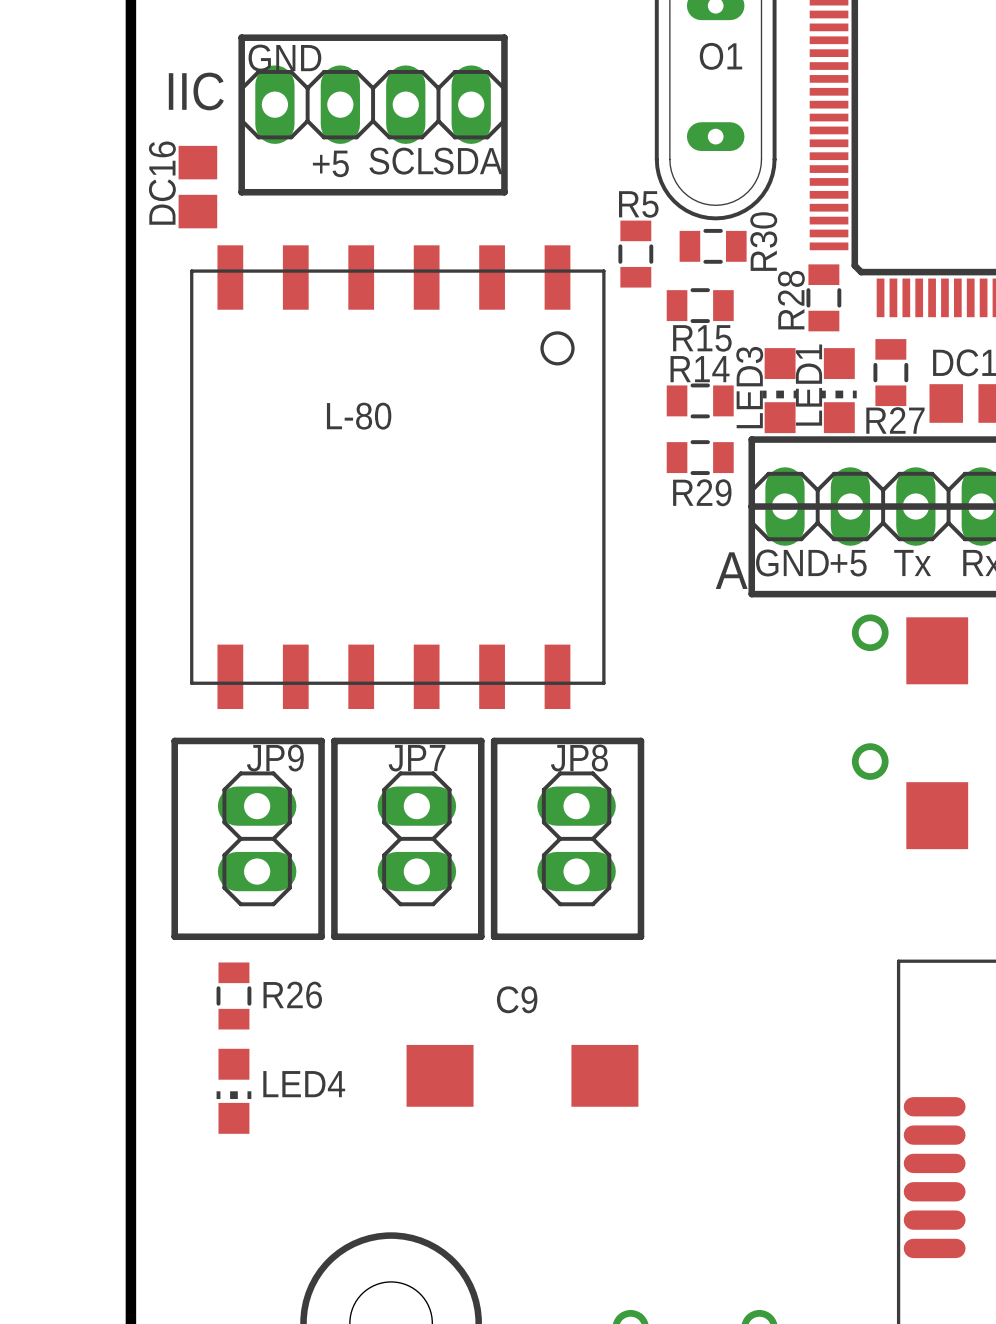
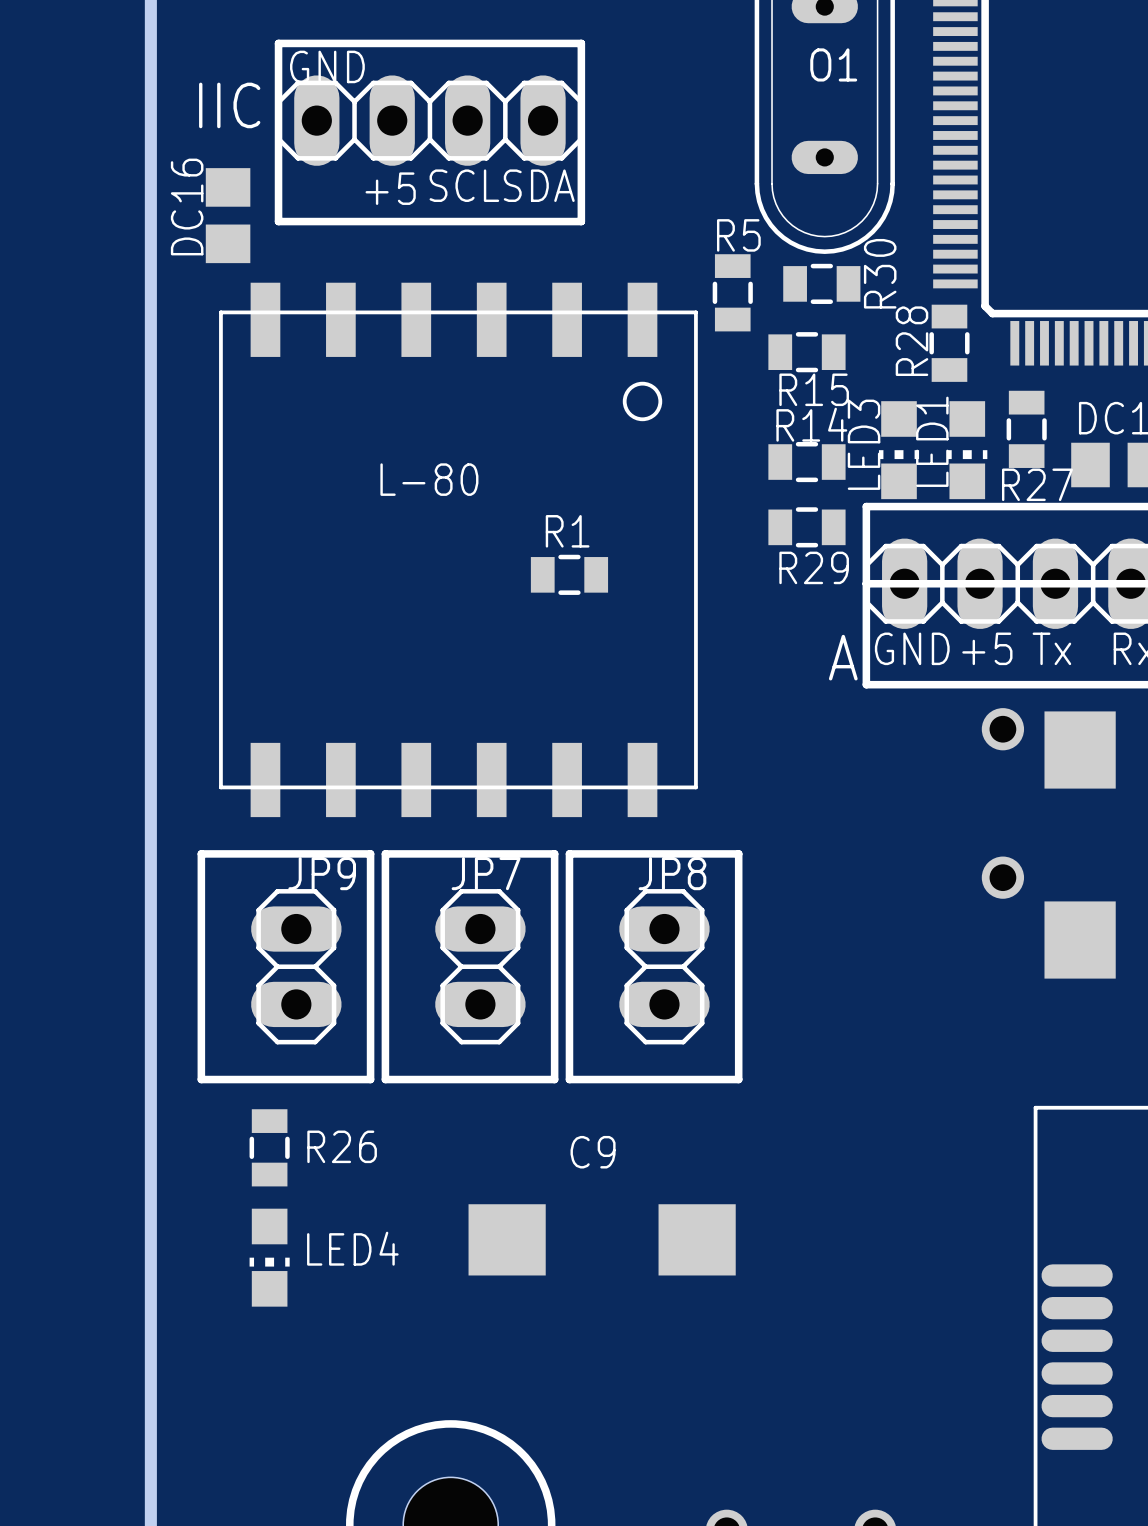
R1: none -> (569, 574)

